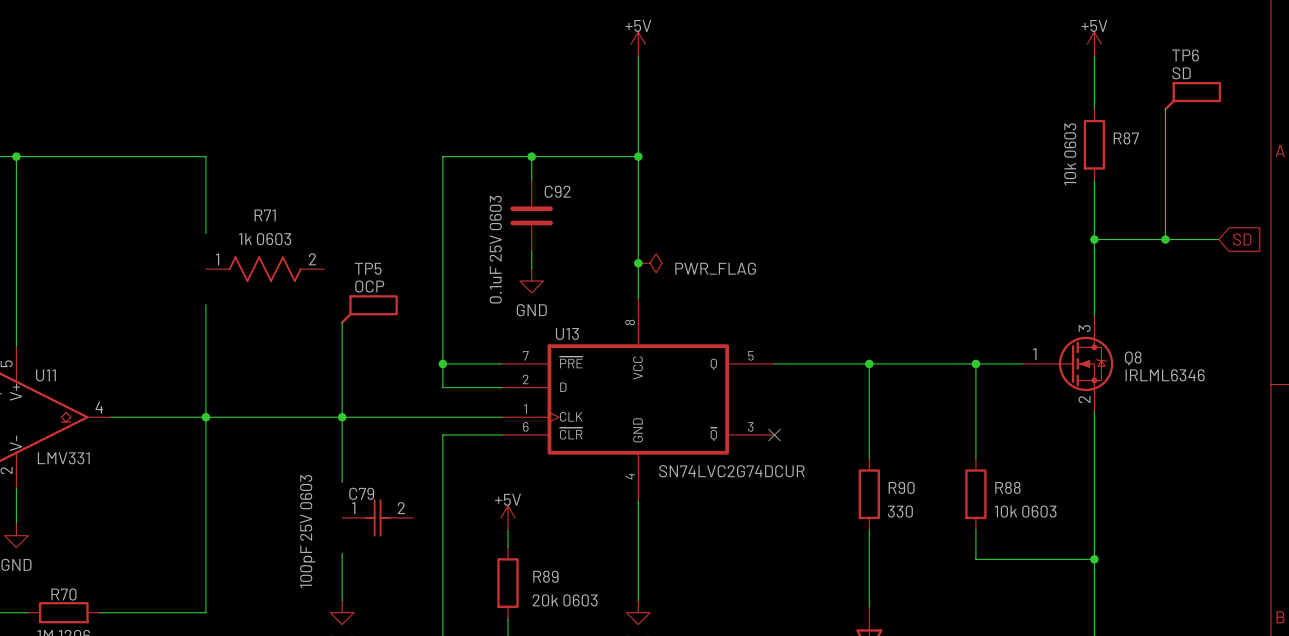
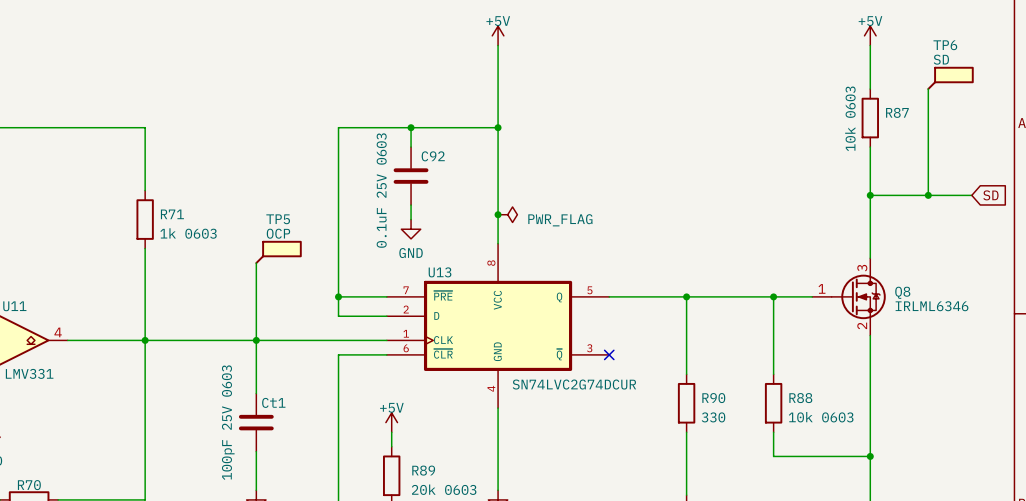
R71 name position: R71 (265, 215) -> R71 (172, 214)
R71 value position: 1k 0603 (265, 239) -> 1k 0603 (188, 233)
R71 symbol: [205, 256, 325, 282] -> [136, 190, 154, 249]
Ct1: none -> 100pF 25V 0603 (256, 422)
C79: 100pF 25V 0603 (377, 517) -> none

